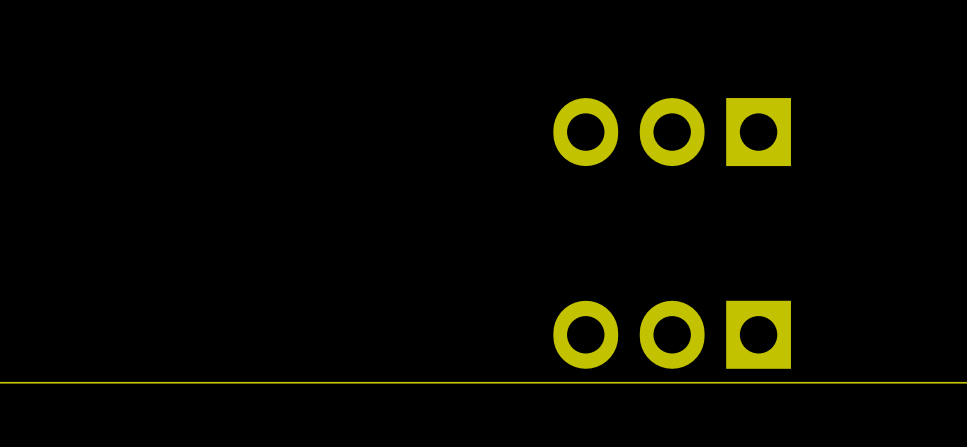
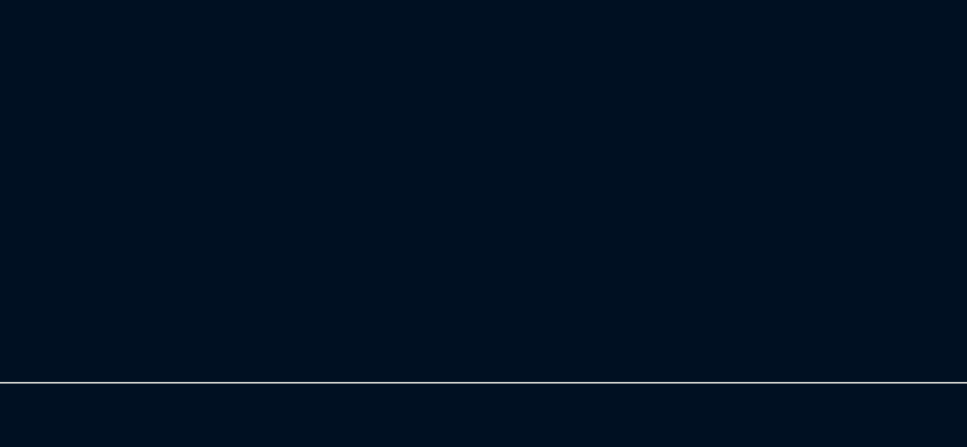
part: (672, 132) -> none
part: (672, 334) -> none

